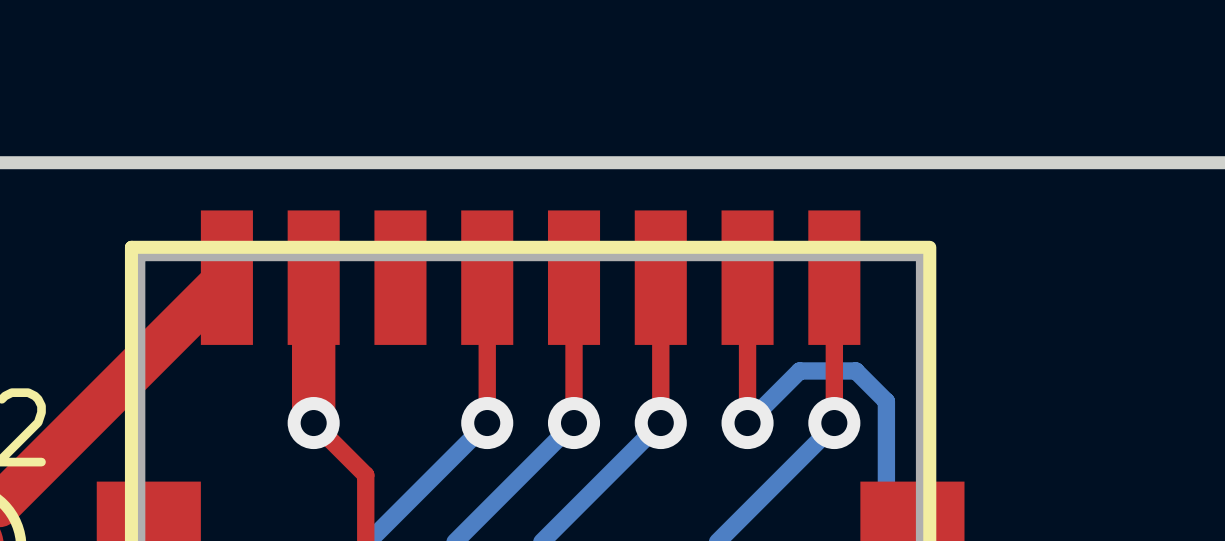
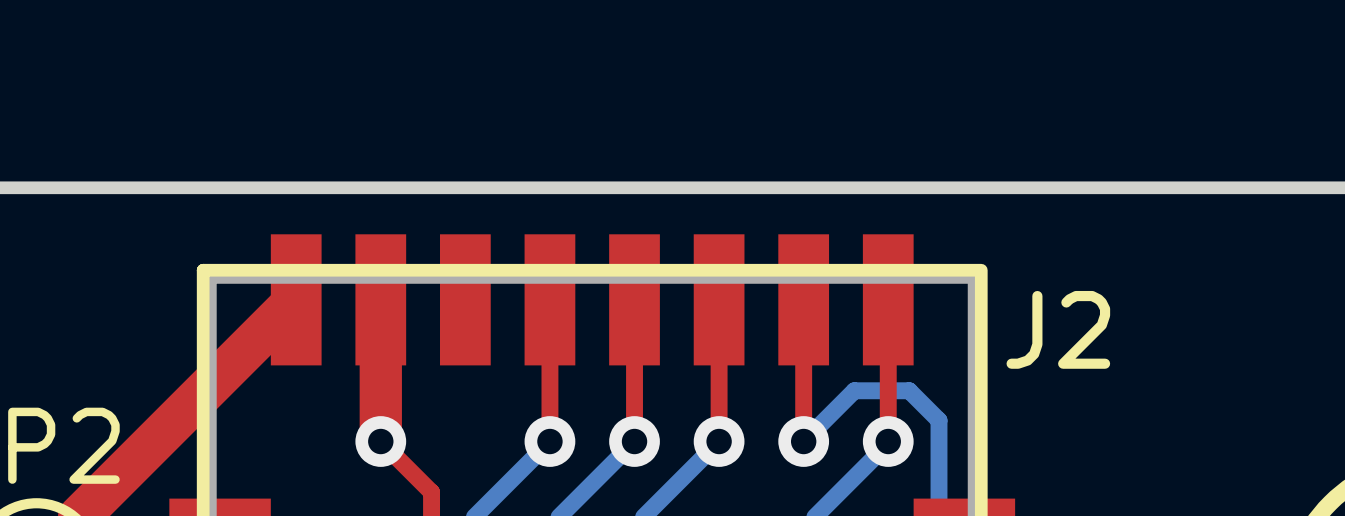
J2 name: none -> J2 (1058, 329)

